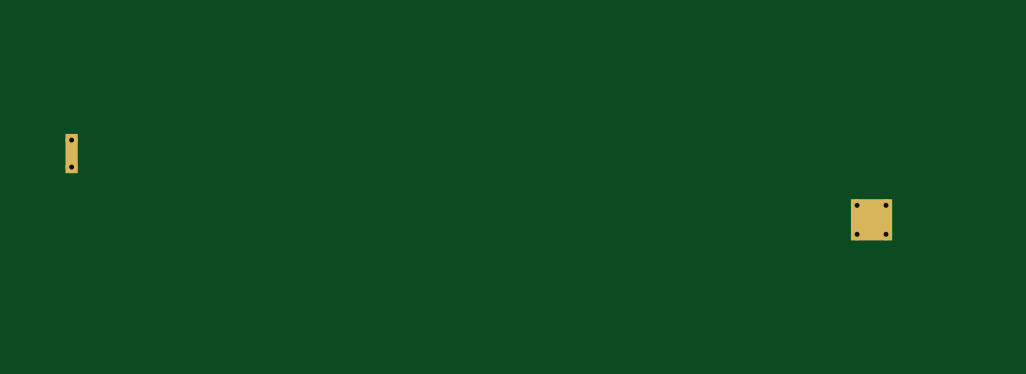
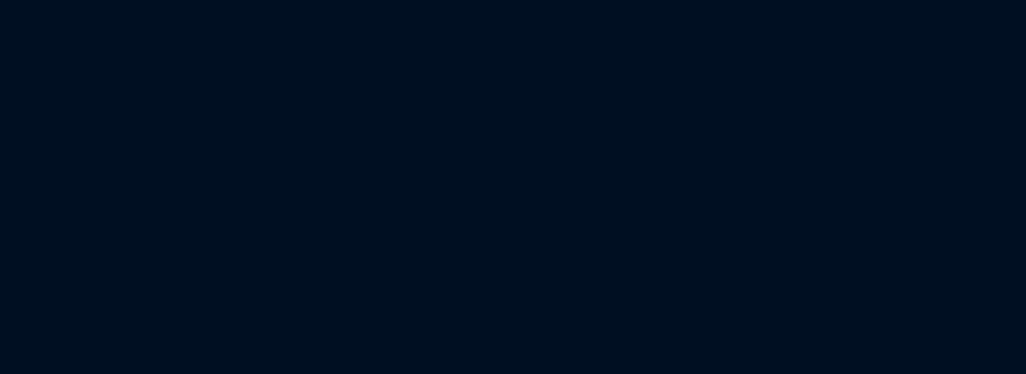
part: (71, 153) -> none
part: (871, 219) -> none

